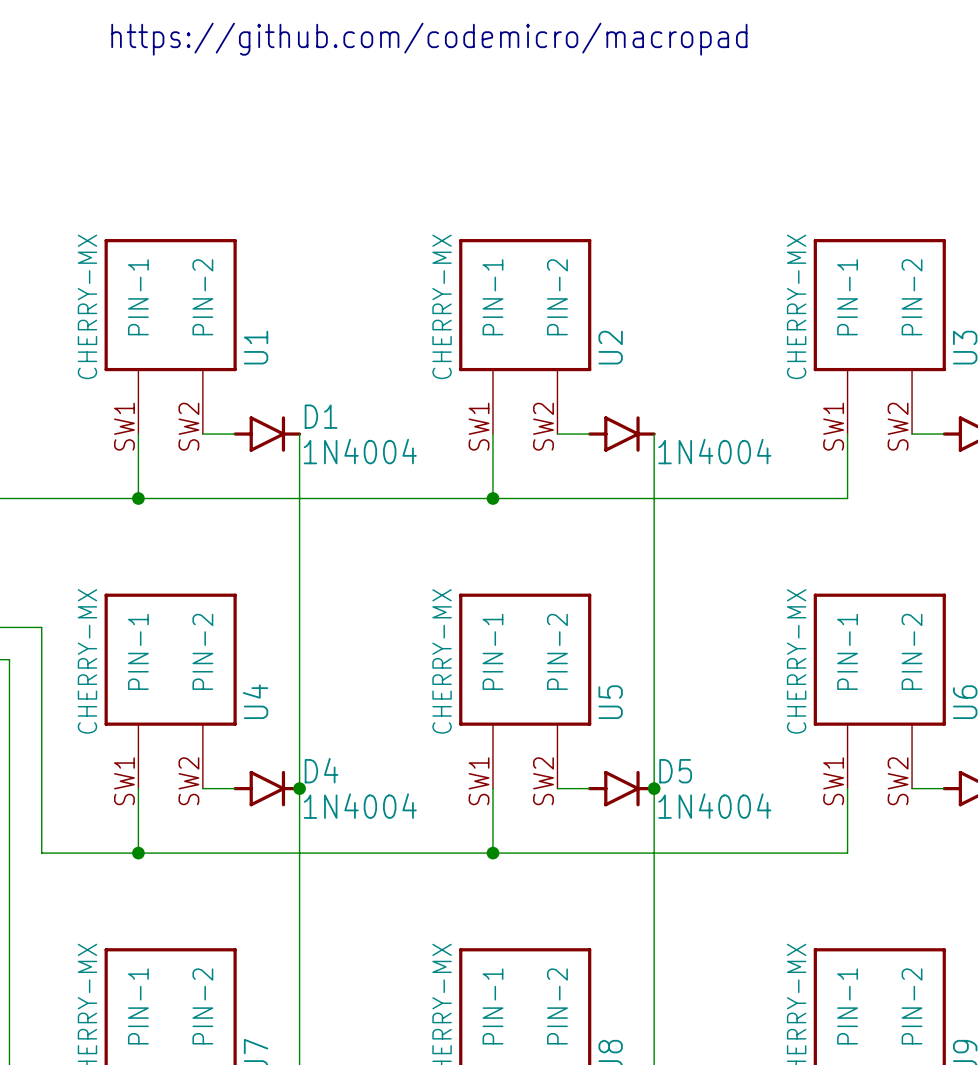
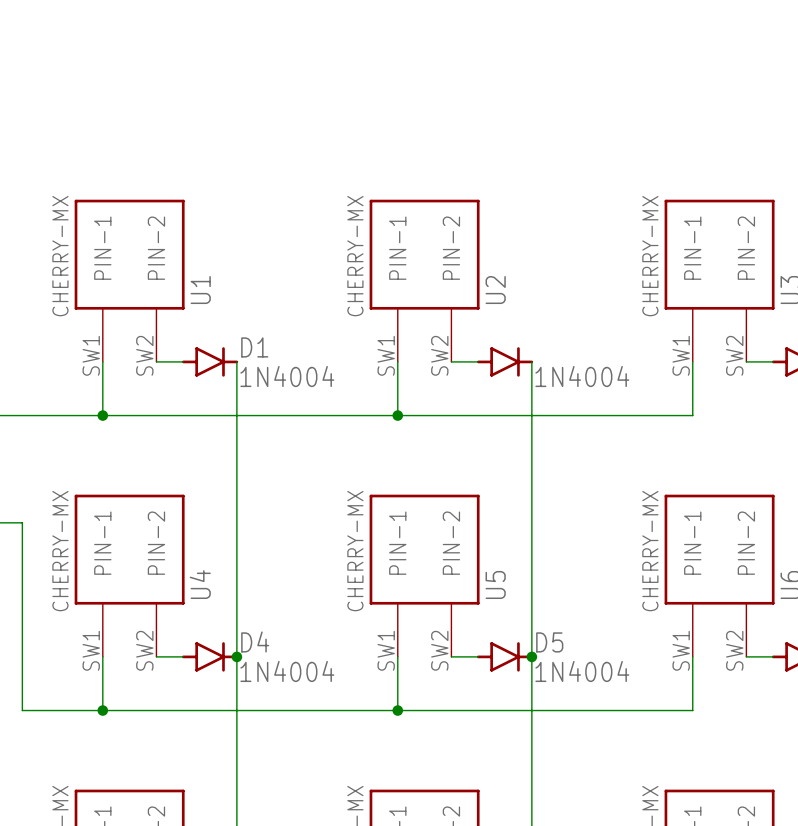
text: https://github.com/codemicro/macropad (429, 39) -> none

